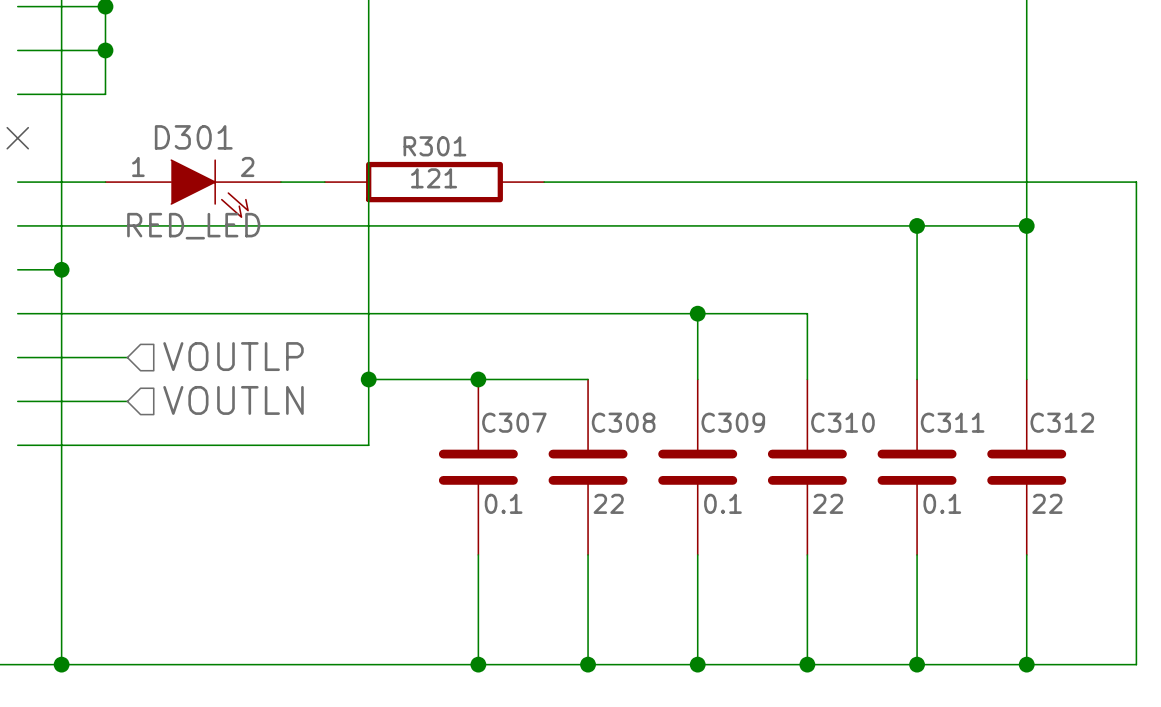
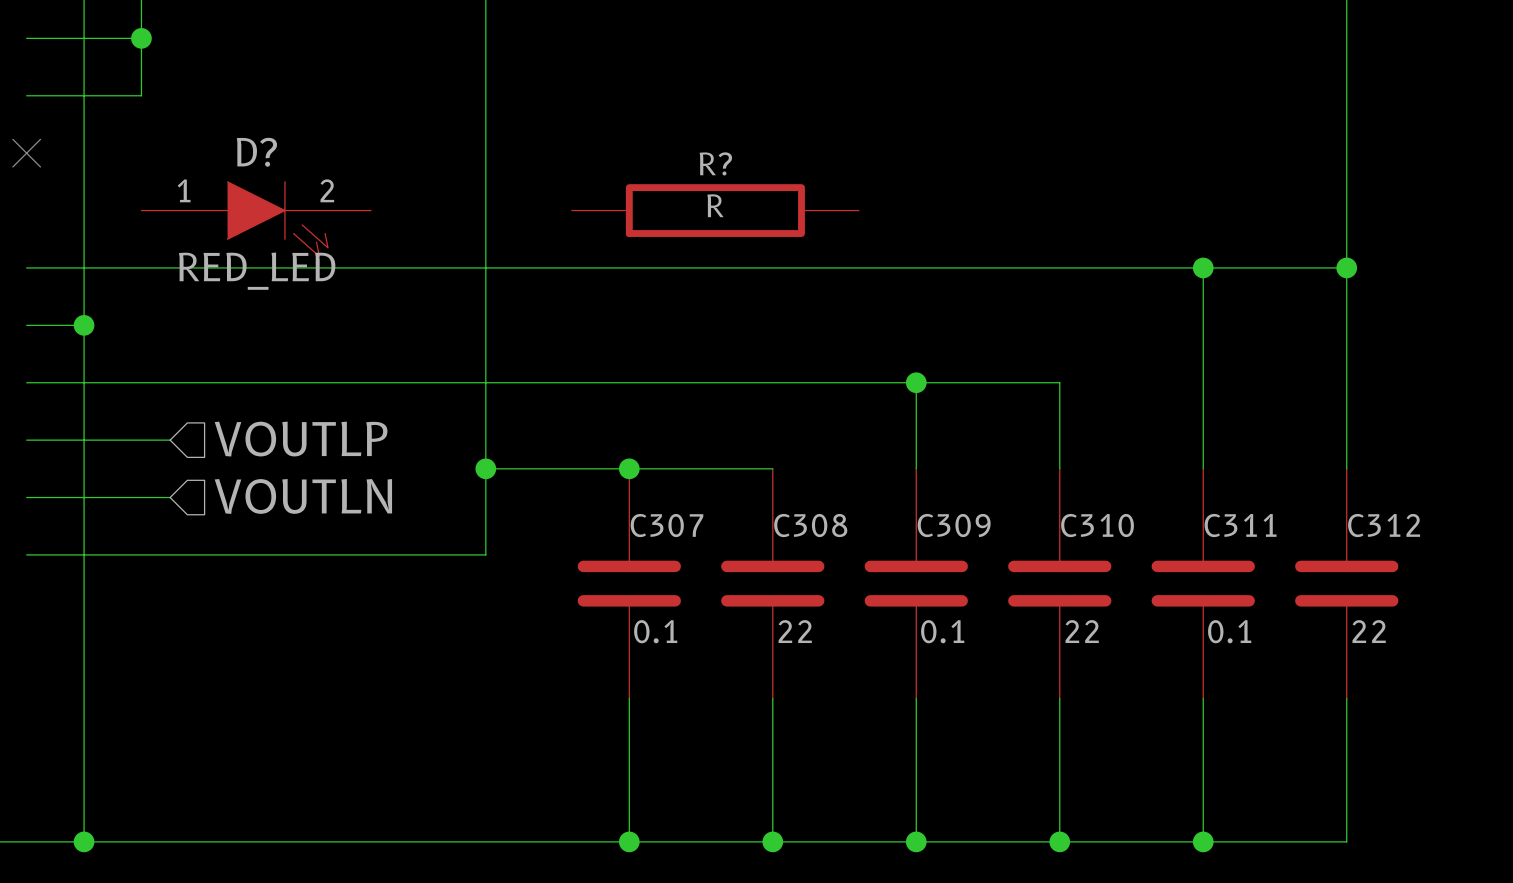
D301 name: D301 (193, 137) -> D? (256, 152)
wire: (17, 182) (105, 182) -> none
wire: (280, 182) (324, 182) -> none
R301: 121 (434, 182) -> none
wire: (544, 182) (1136, 182) (1136, 664) (1026, 664) -> none
R?: none -> R (715, 210)
junction: (1026, 664) -> none

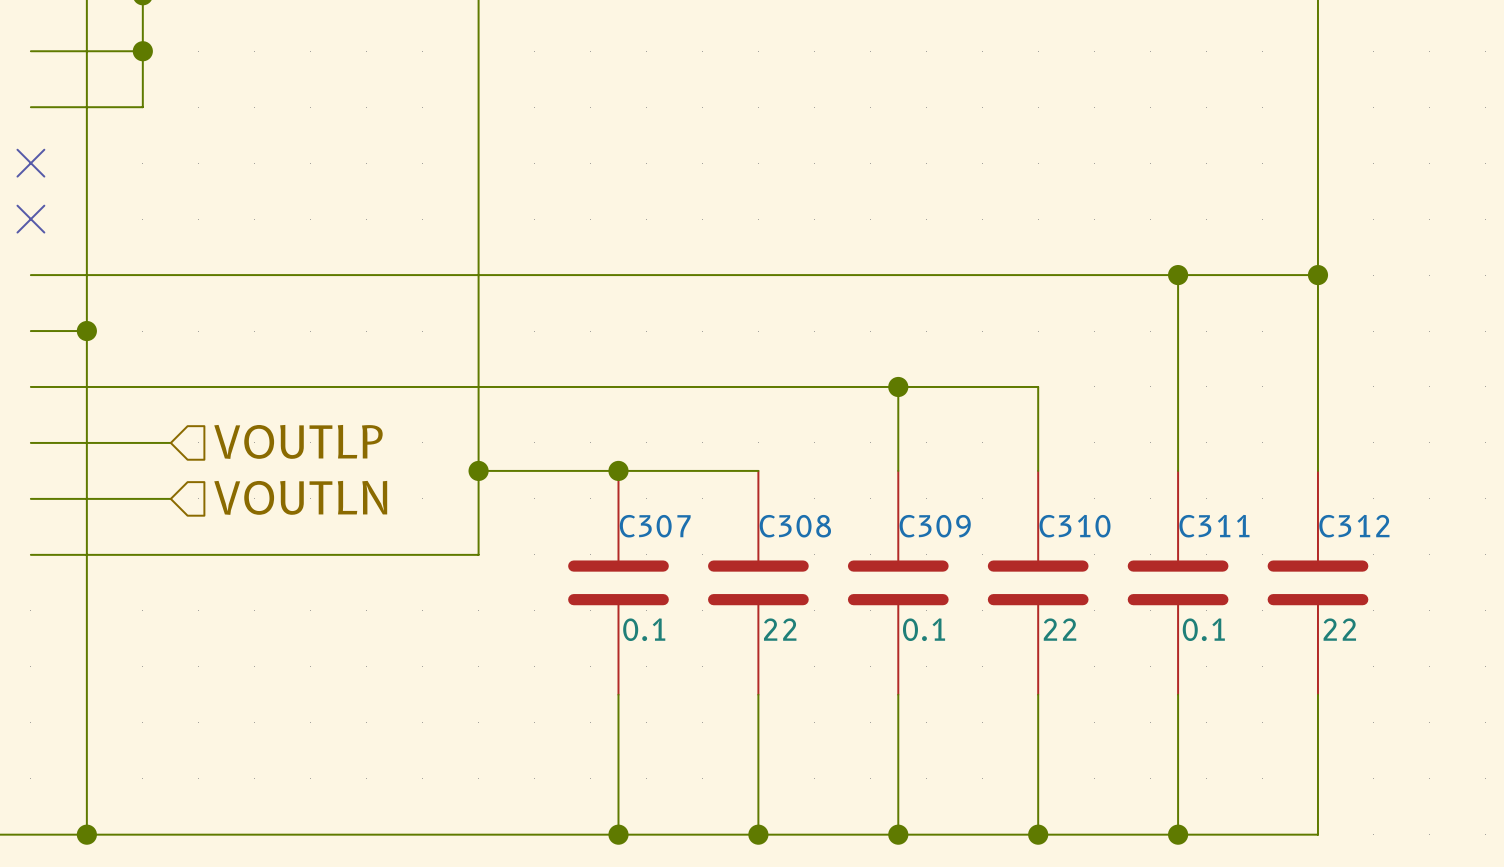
no-connect mark: none -> (30, 219)
R?: R (715, 210) -> none
D?: RED_LED (256, 219) -> none

